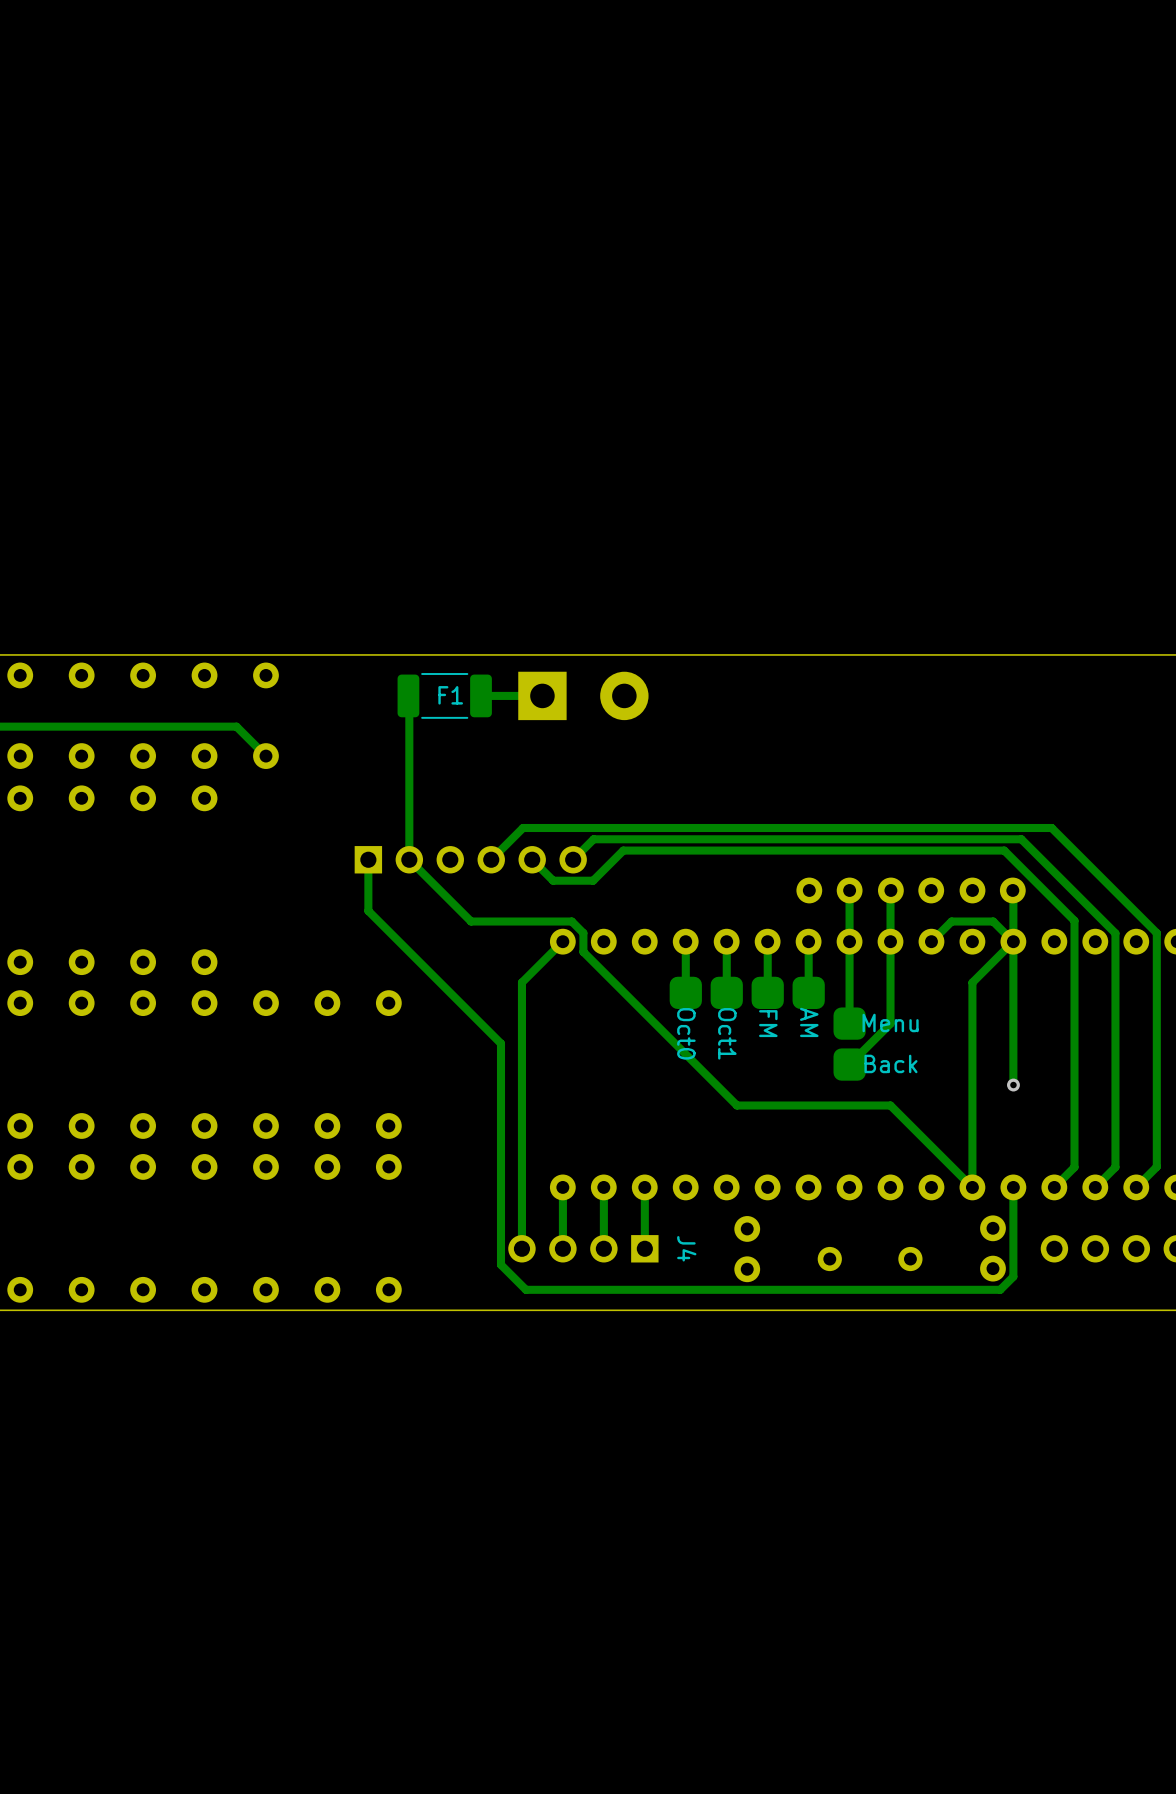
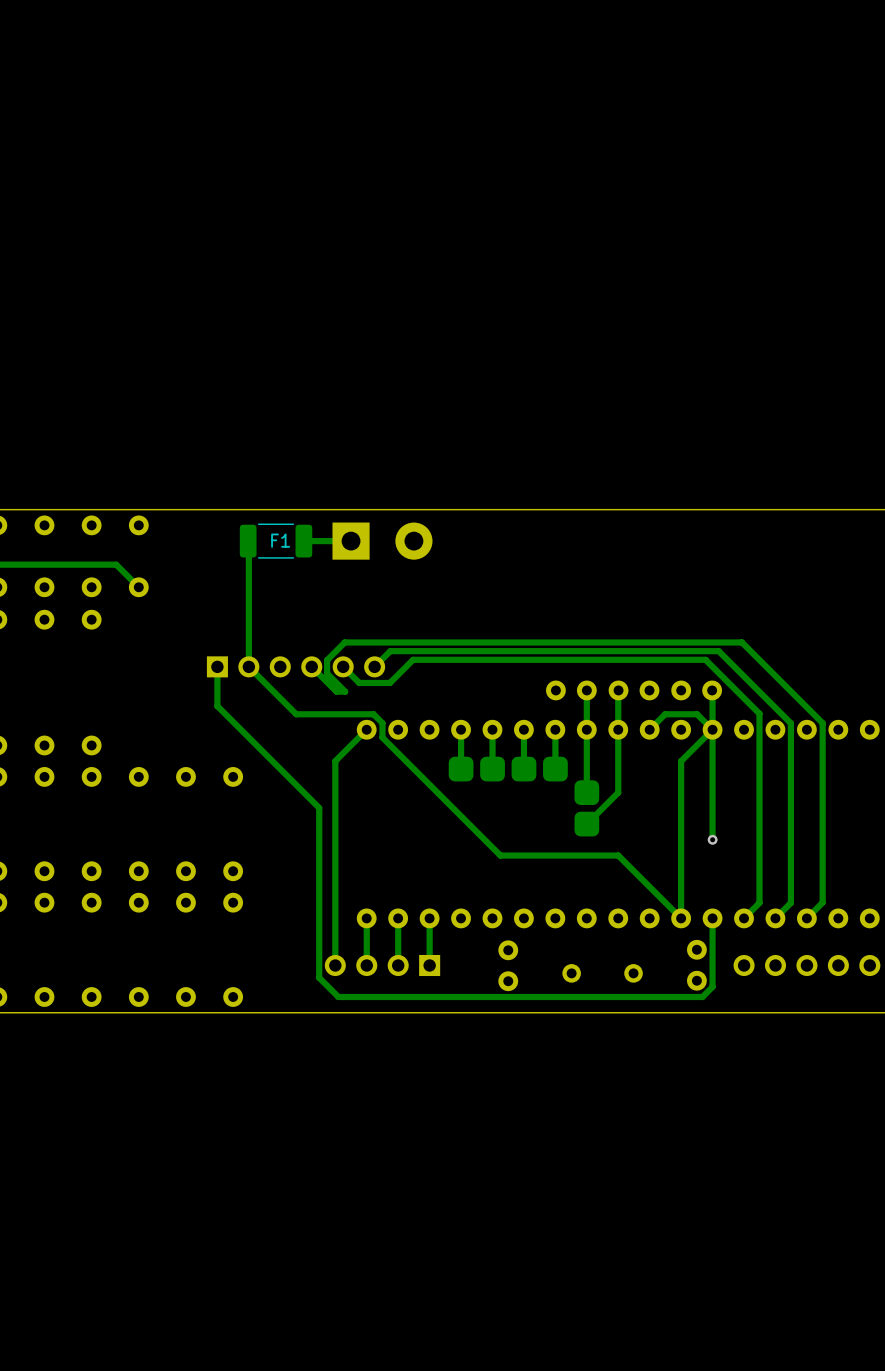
track: (534, 827) (523, 827) (491, 859) -> (344, 642) (327, 660) (327, 673) (345, 691) (336, 691) (311, 666)
text: AM (809, 1022) -> none
text: Menu (890, 1022) -> none
text: FM (768, 1023) -> none
text: Oct0 (686, 1033) -> none
text: Oct1 (727, 1033) -> none
text: Back (890, 1063) -> none
J4 name: J4 (686, 1248) -> none

